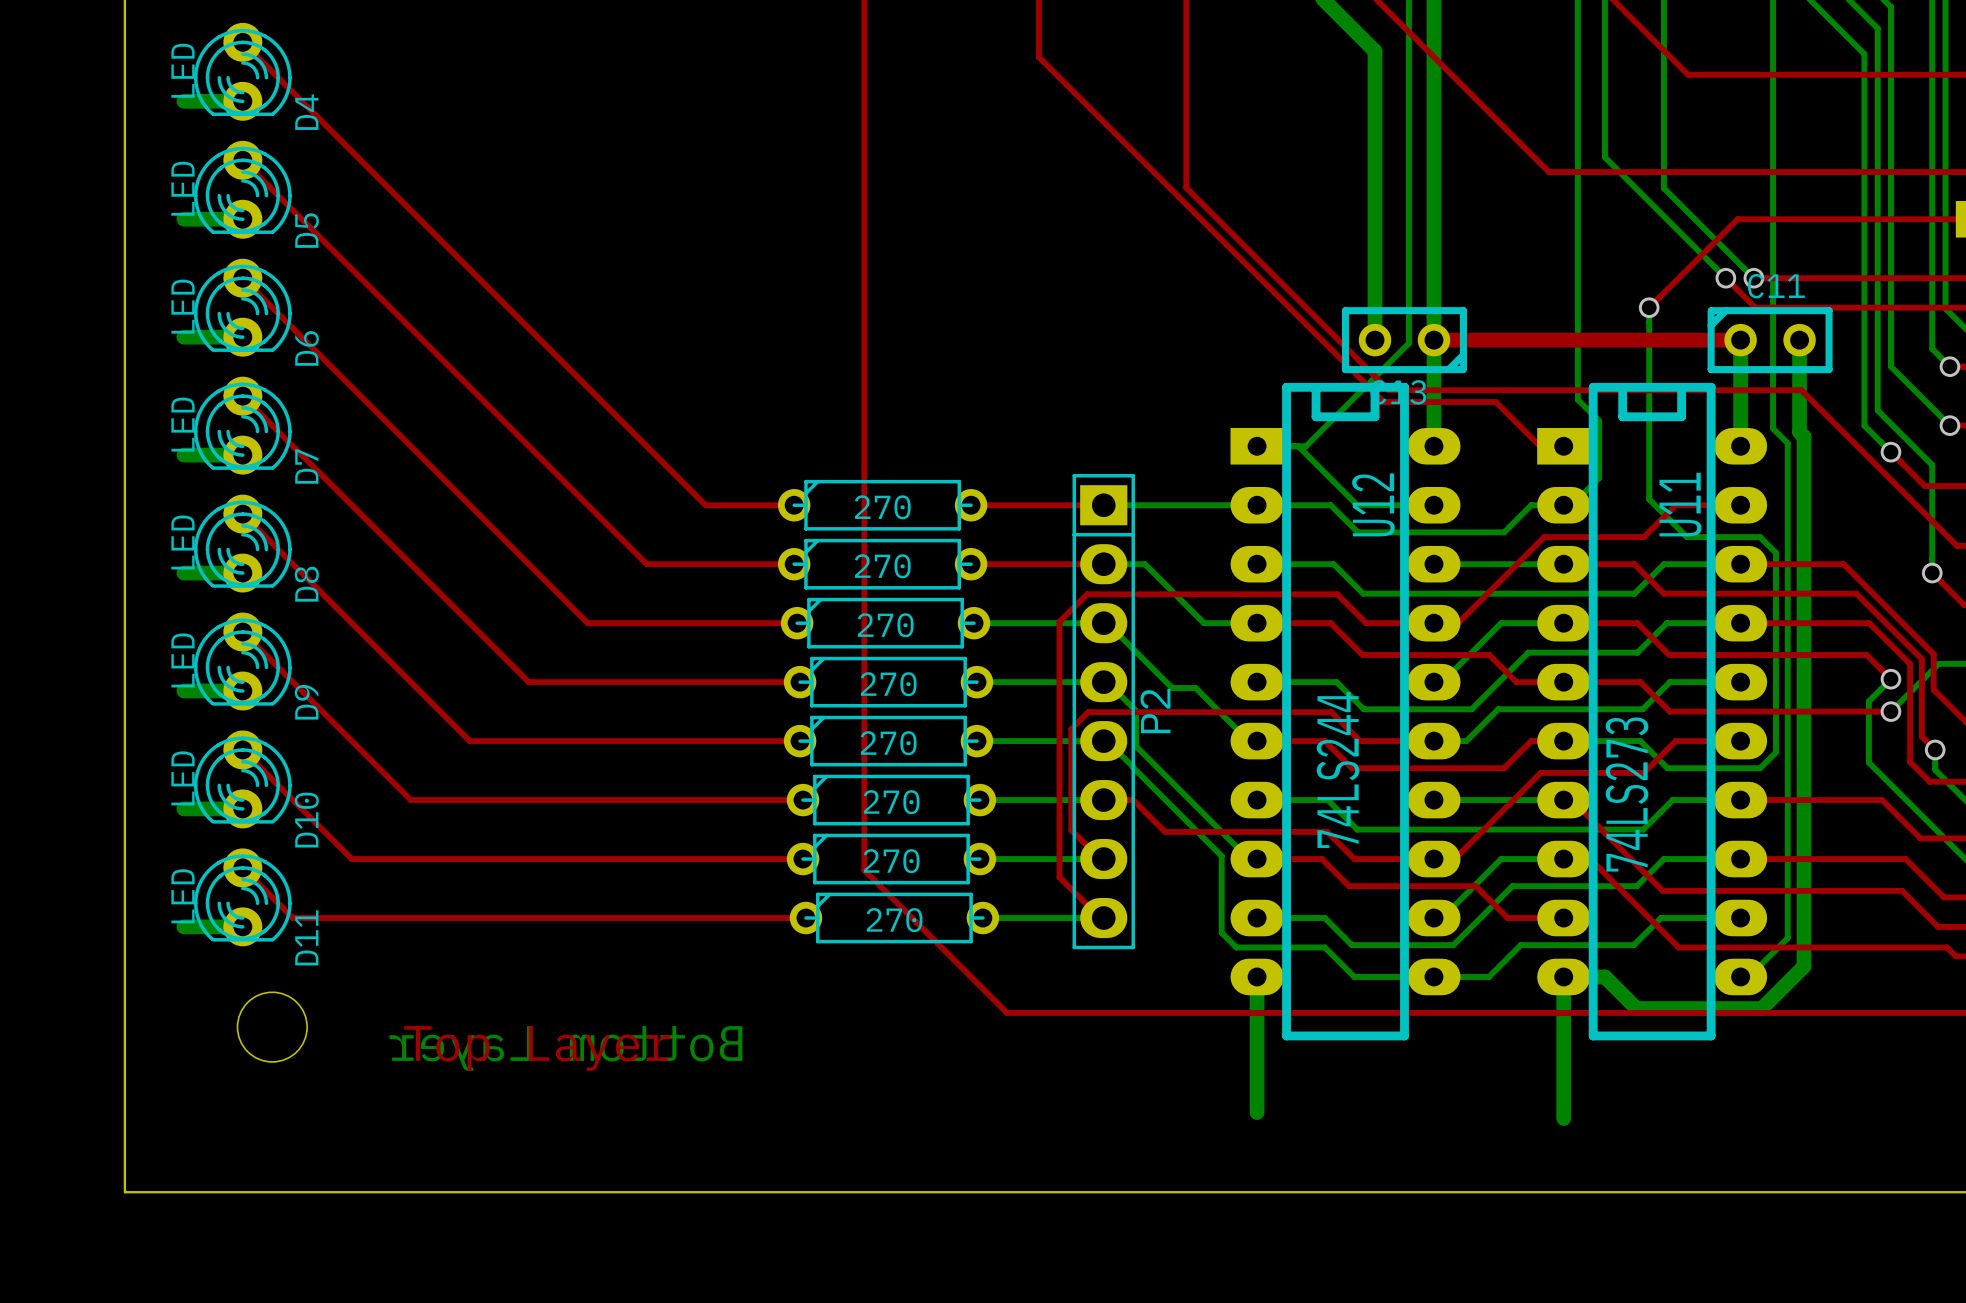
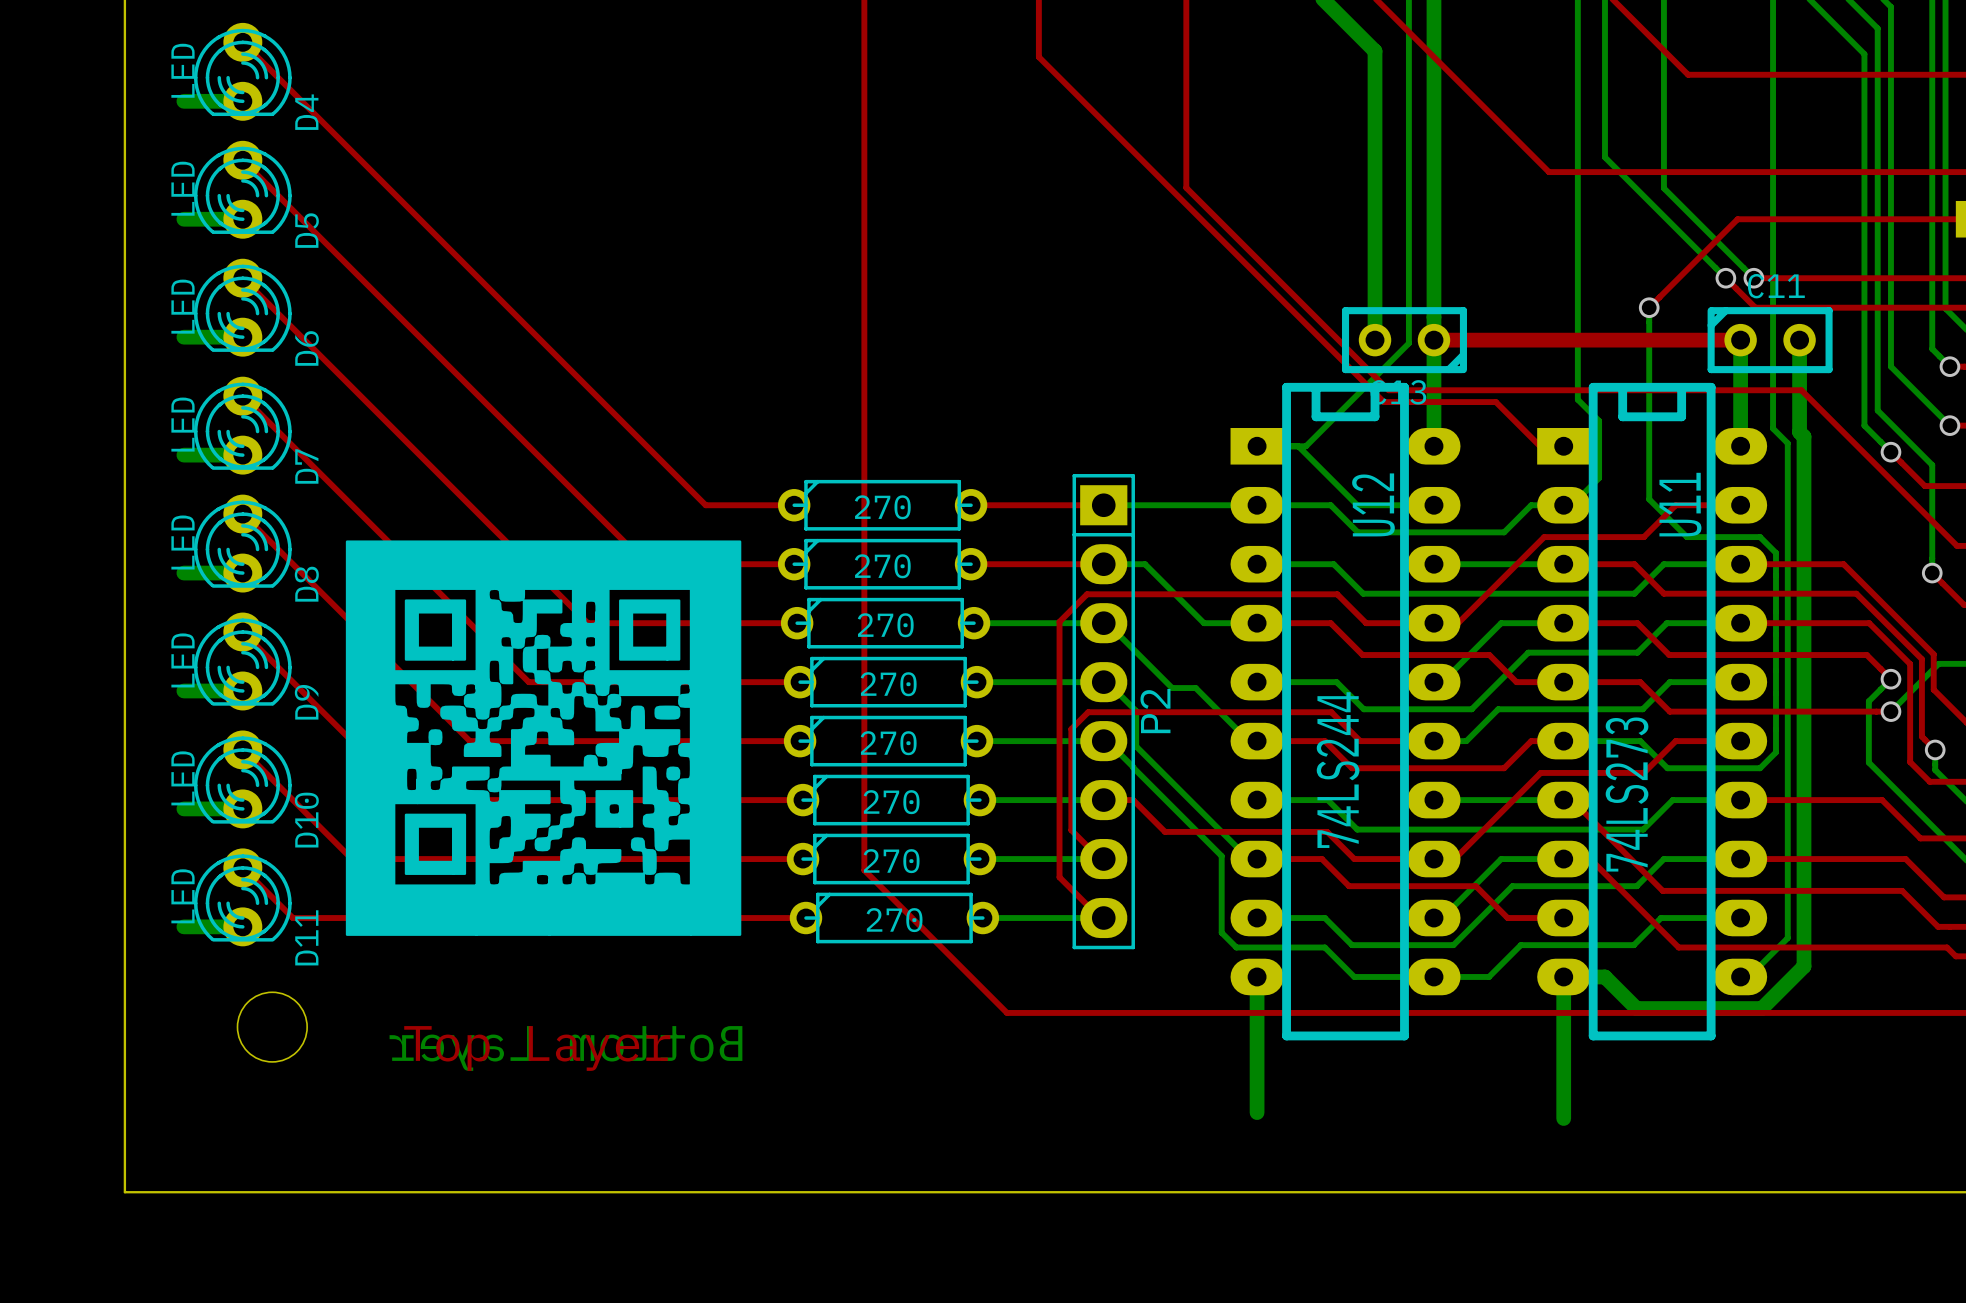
drawing: none -> [345, 540, 742, 936]

